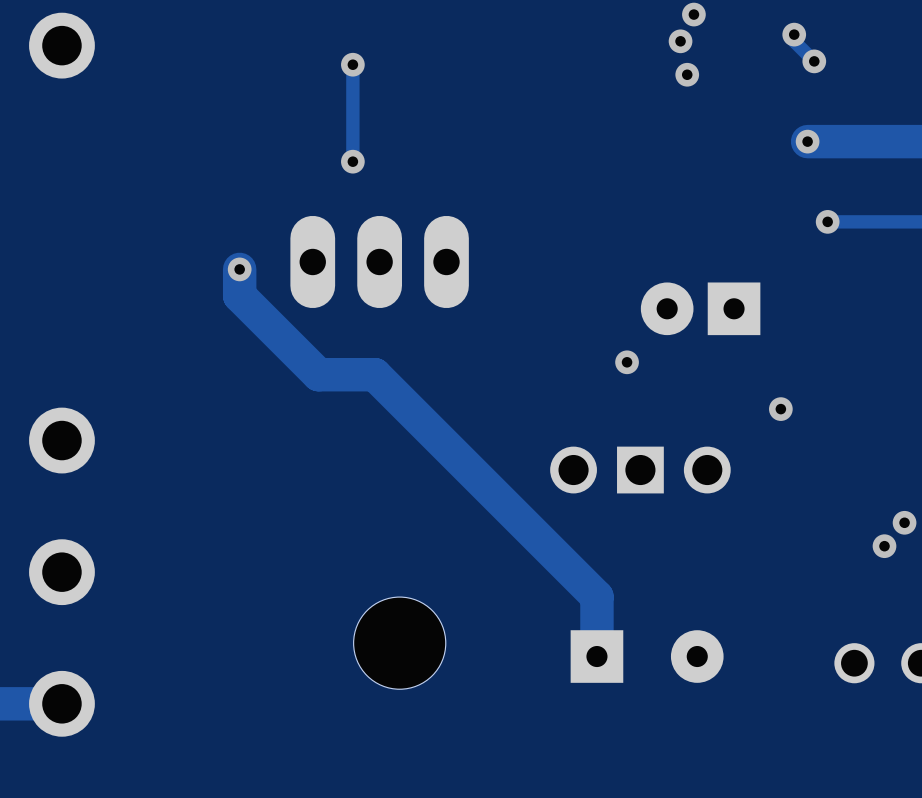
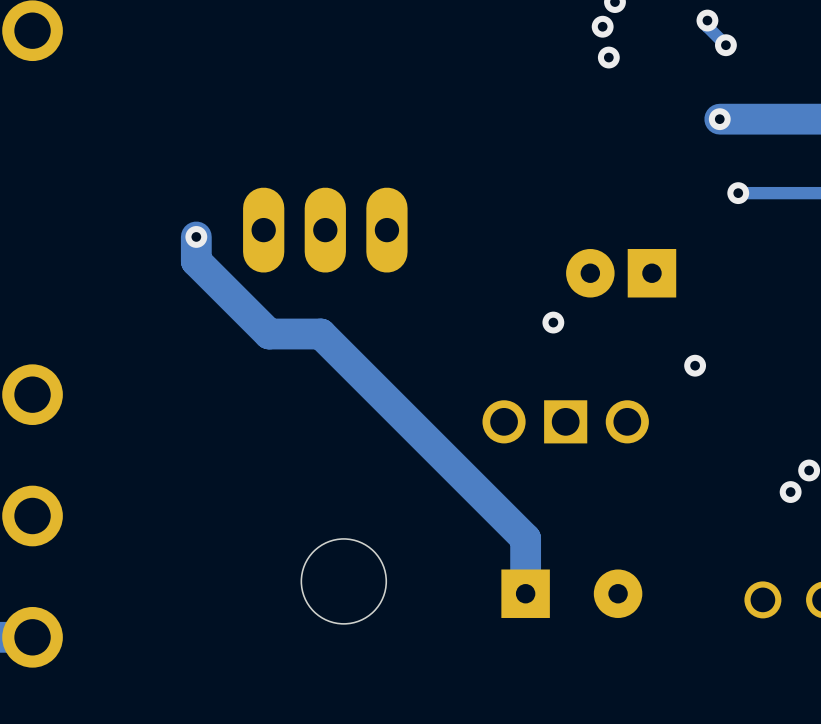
track: (352, 64) (352, 161) -> none
via: (352, 64) -> none
via: (352, 161) -> none

